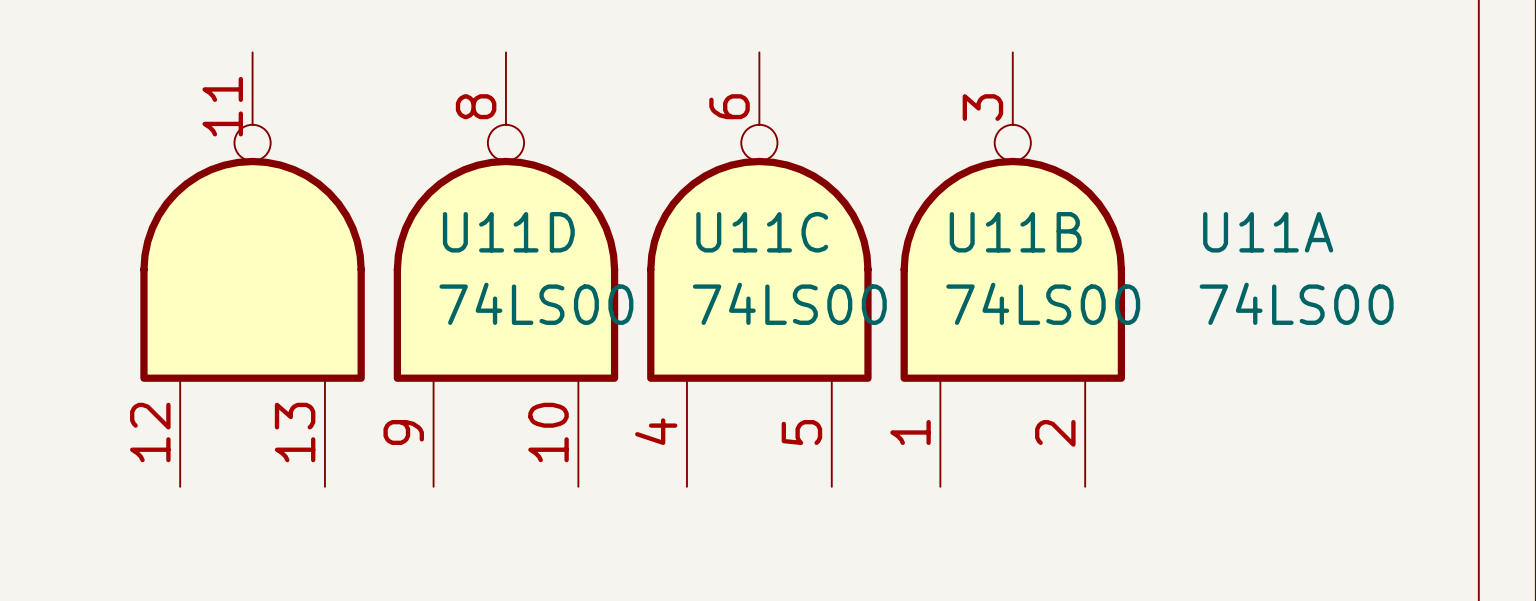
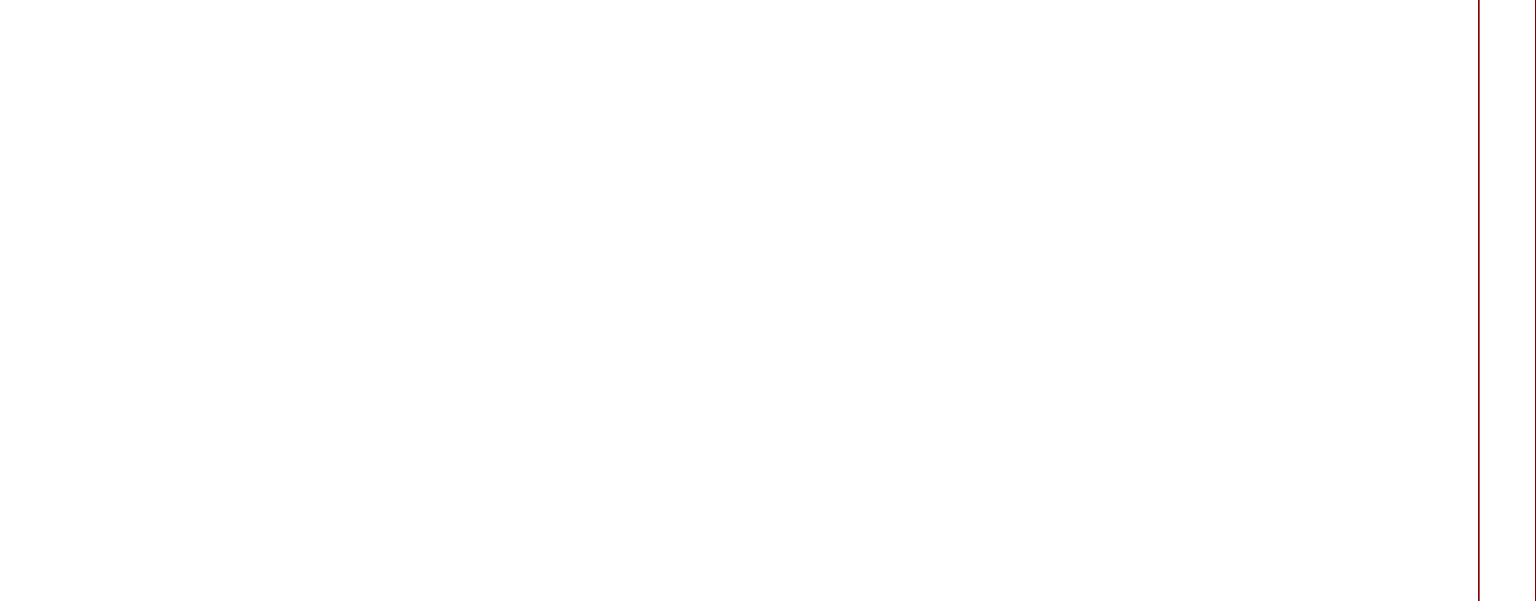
U11D: 74LS00 (252, 269) -> none
U11C: 74LS00 (505, 269) -> none
U11B: 74LS00 (759, 269) -> none
U11A: 74LS00 (1012, 269) -> none

